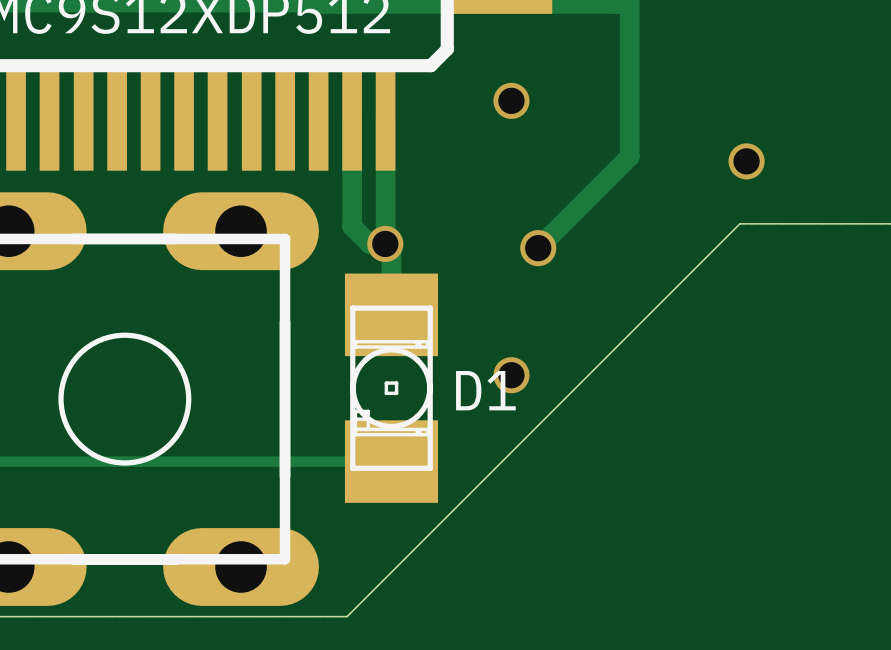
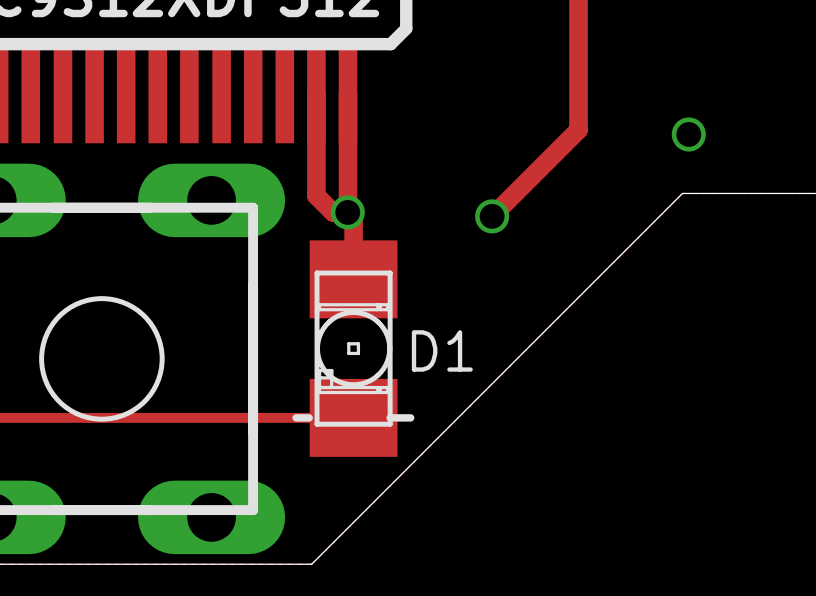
via: (511, 100) -> none
via: (511, 375) -> none
line: none -> (296, 417) (309, 417)
line: none -> (390, 417) (410, 417)

